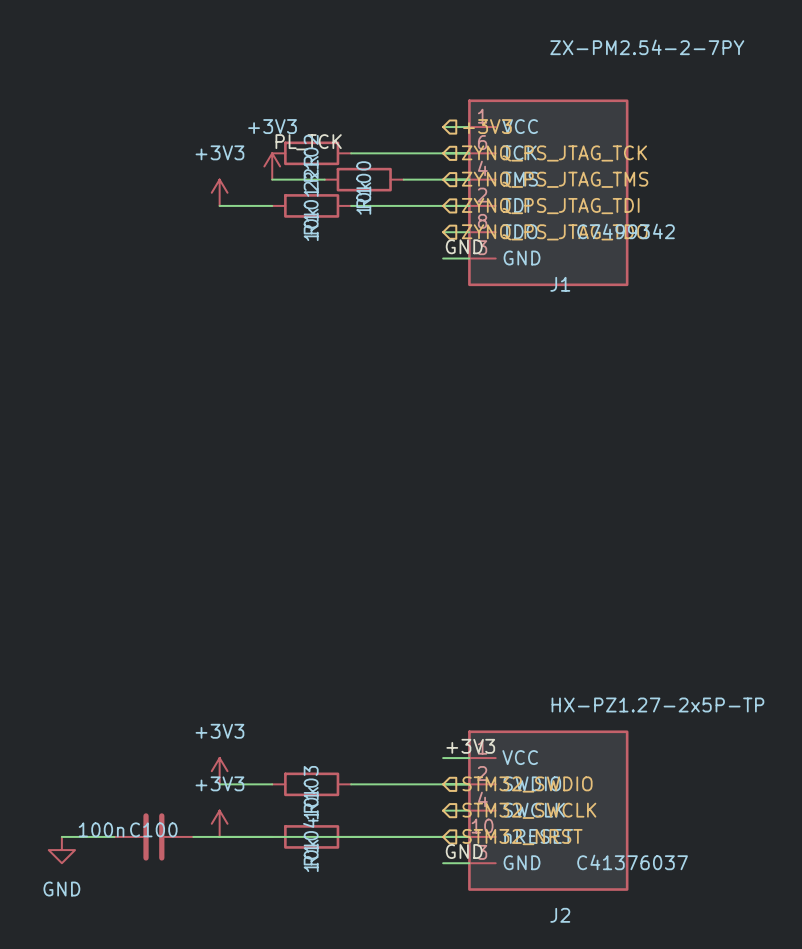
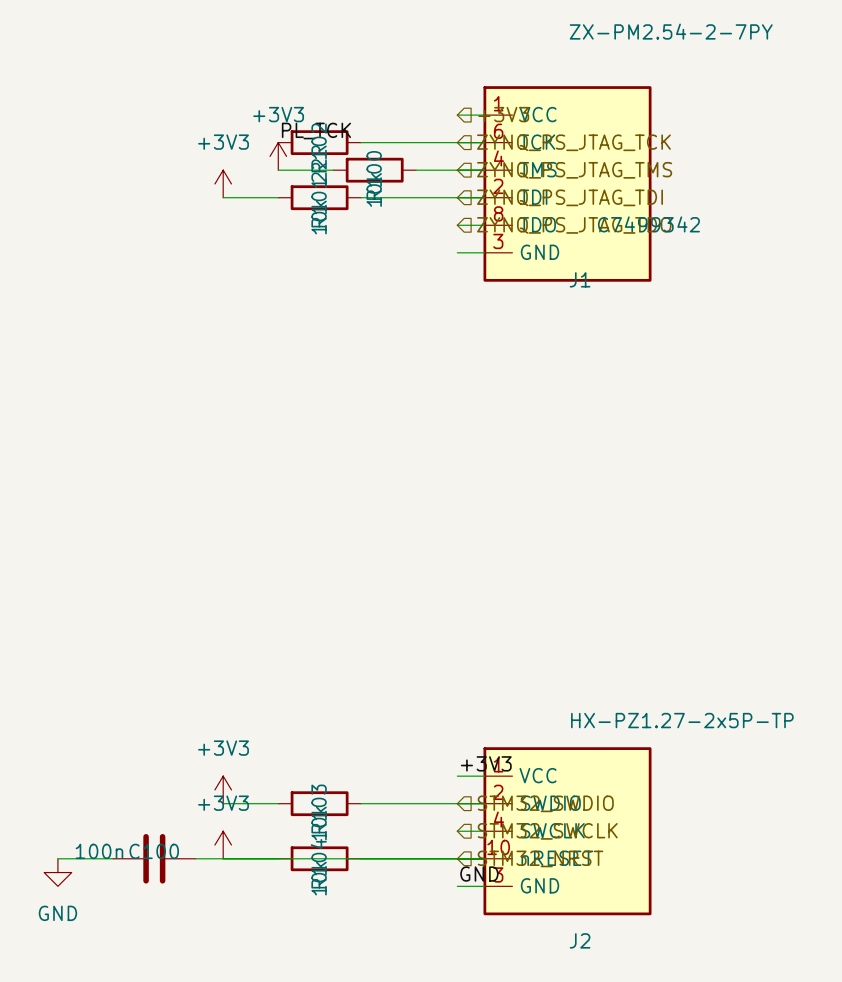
label: GND (464, 246) -> none
J2 text: C41376037 (632, 862) -> none

